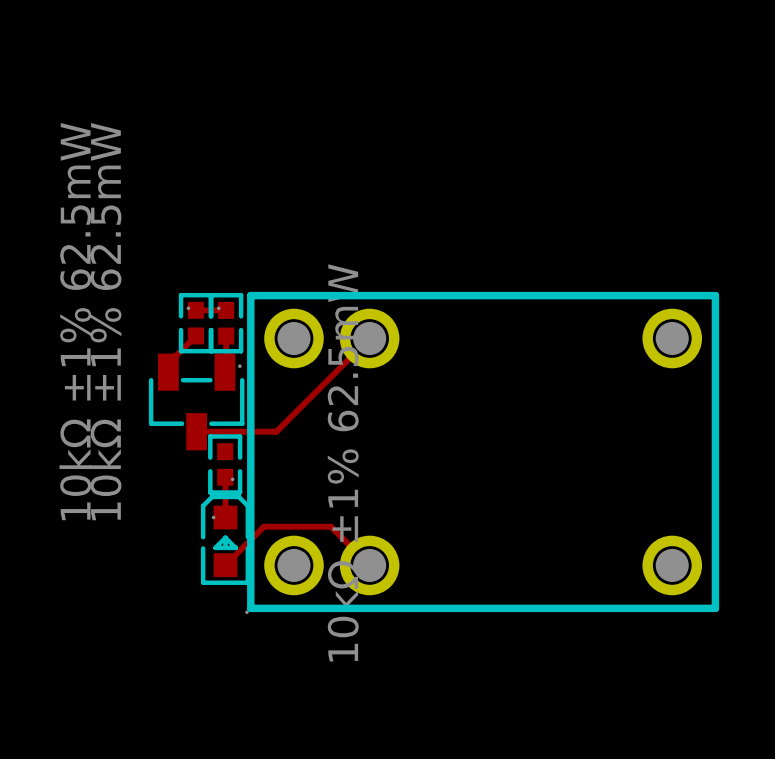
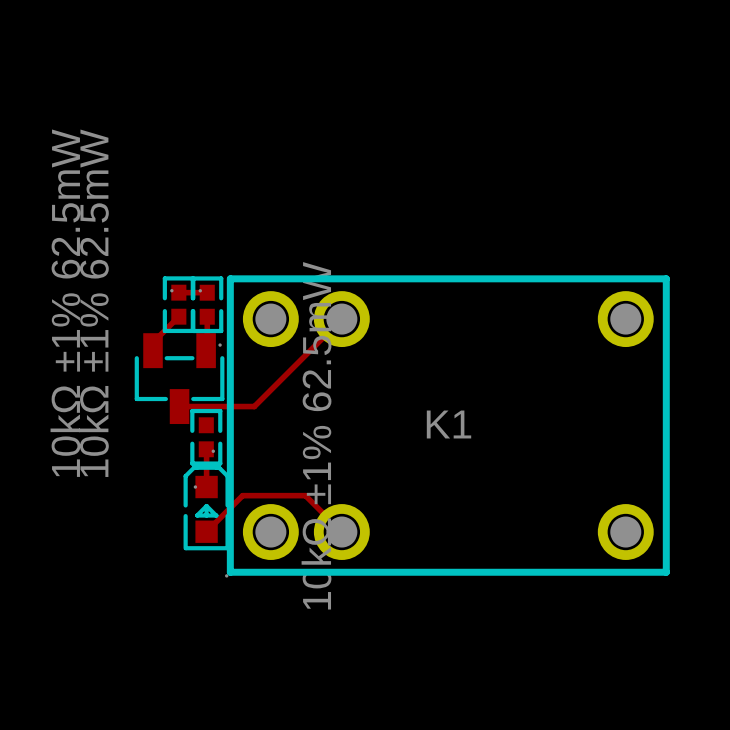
K1 name: none -> K1 (449, 424)

